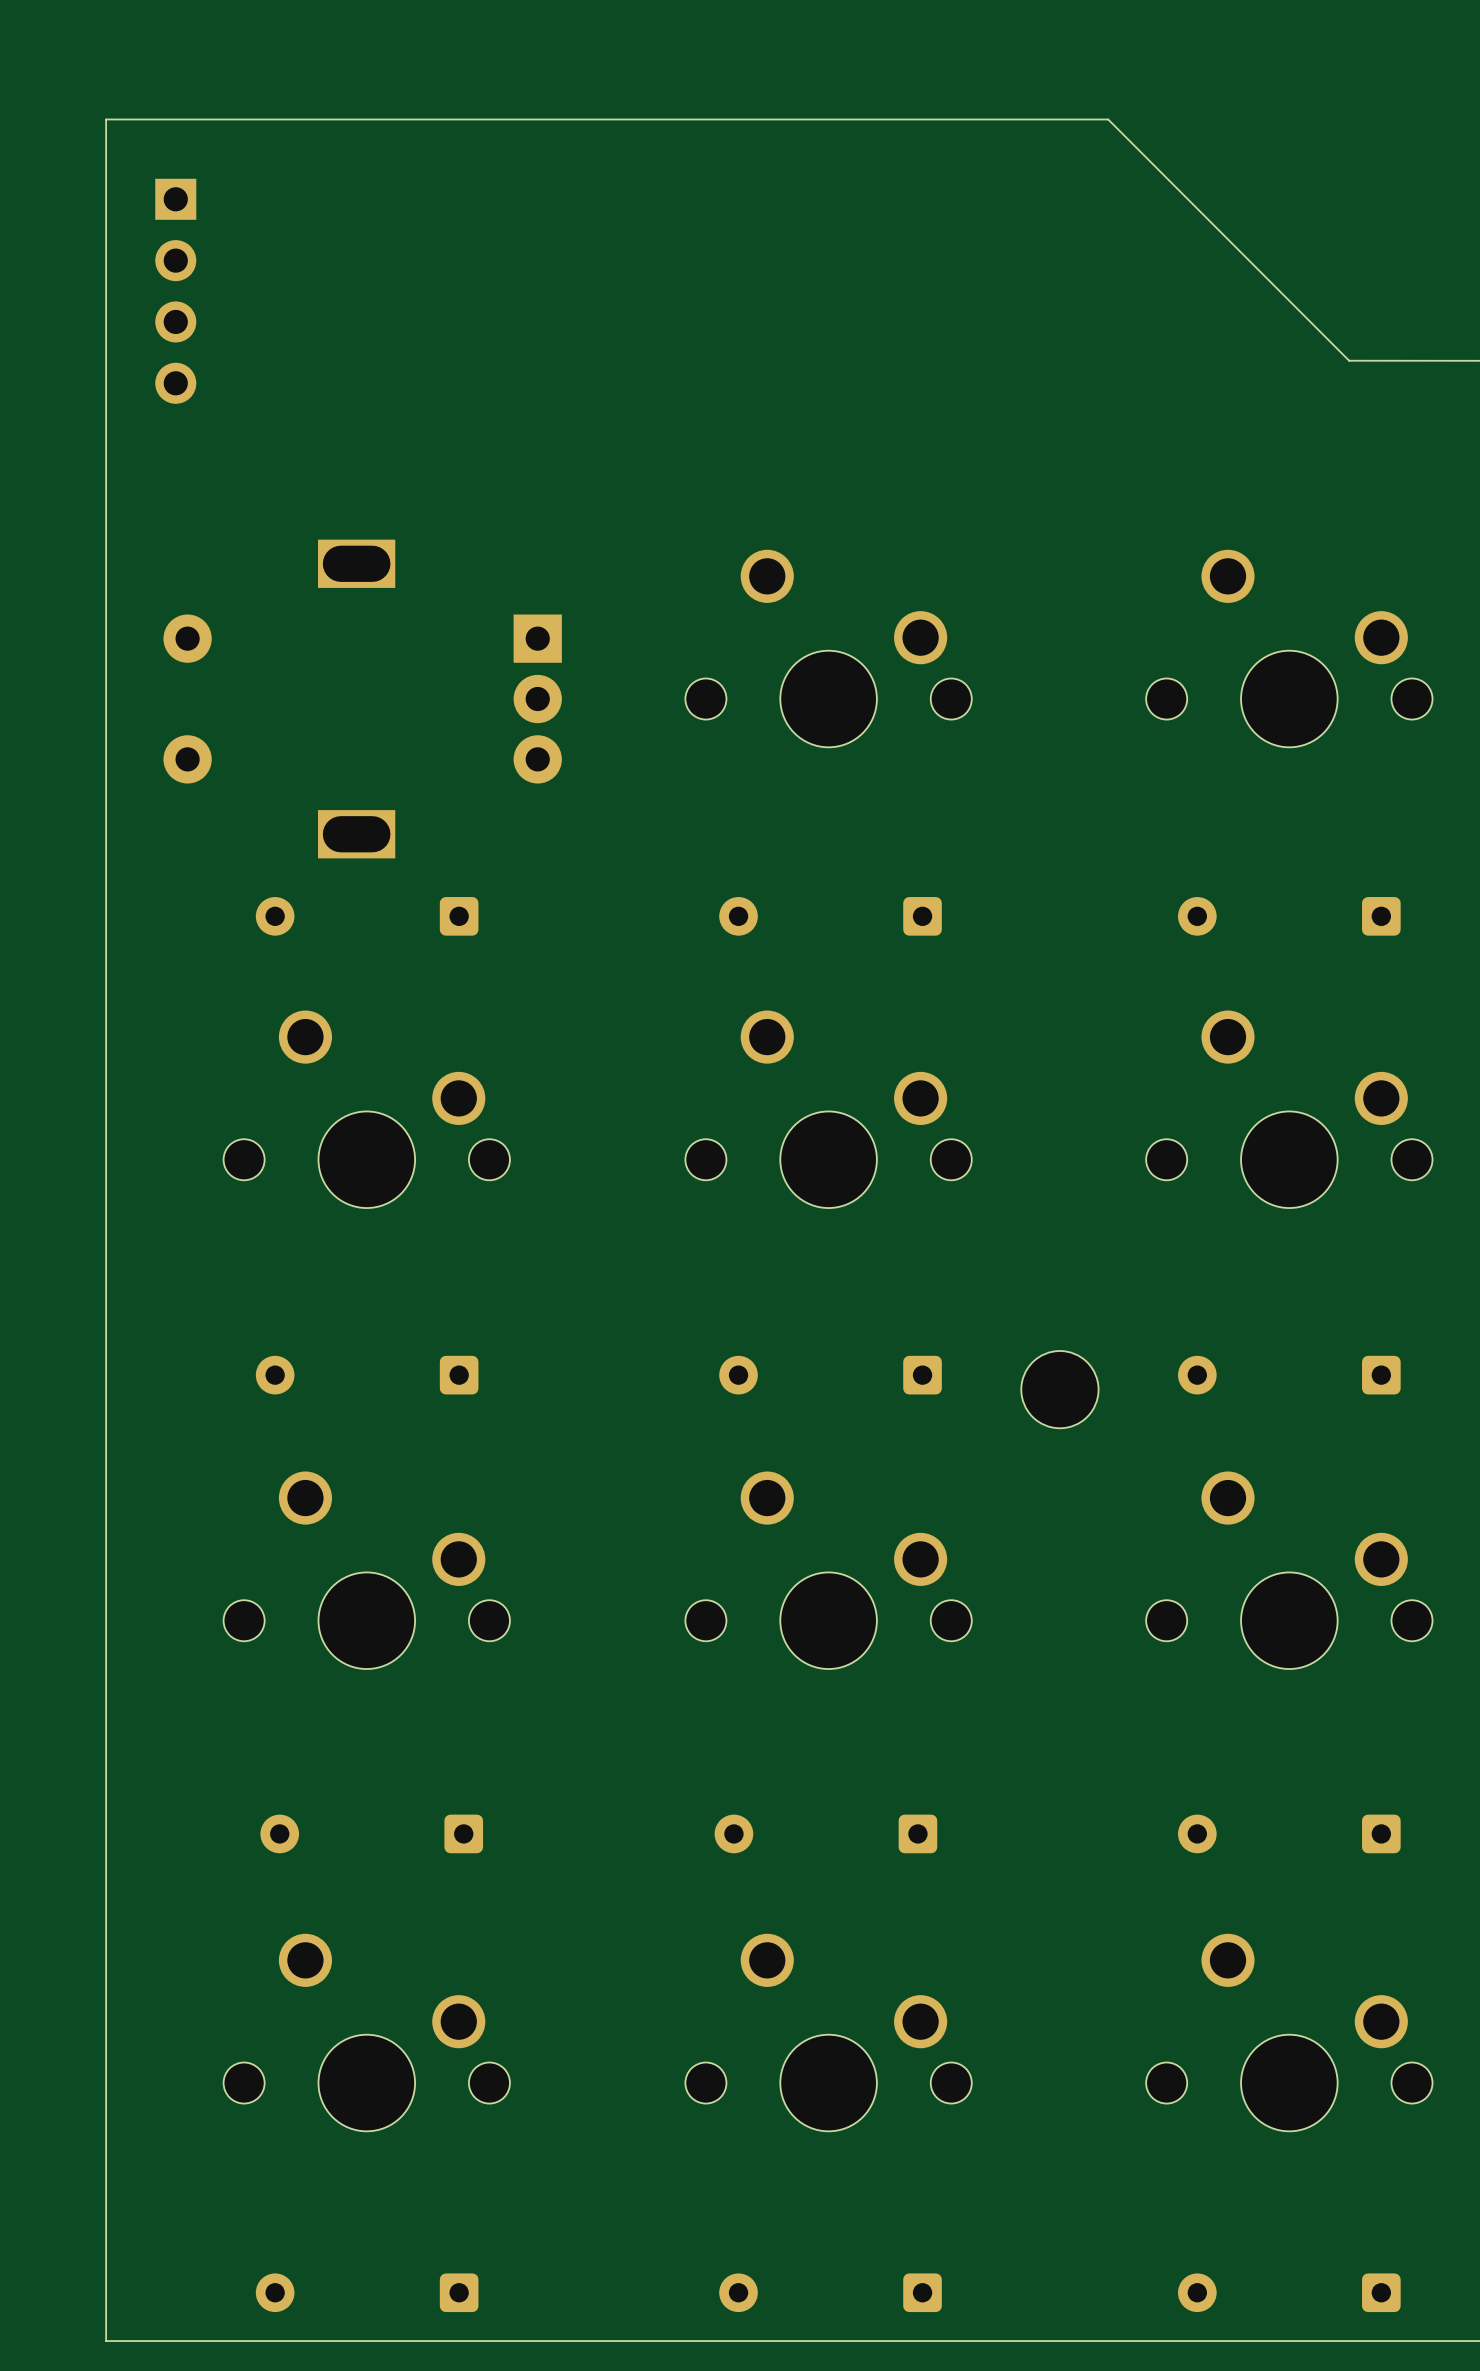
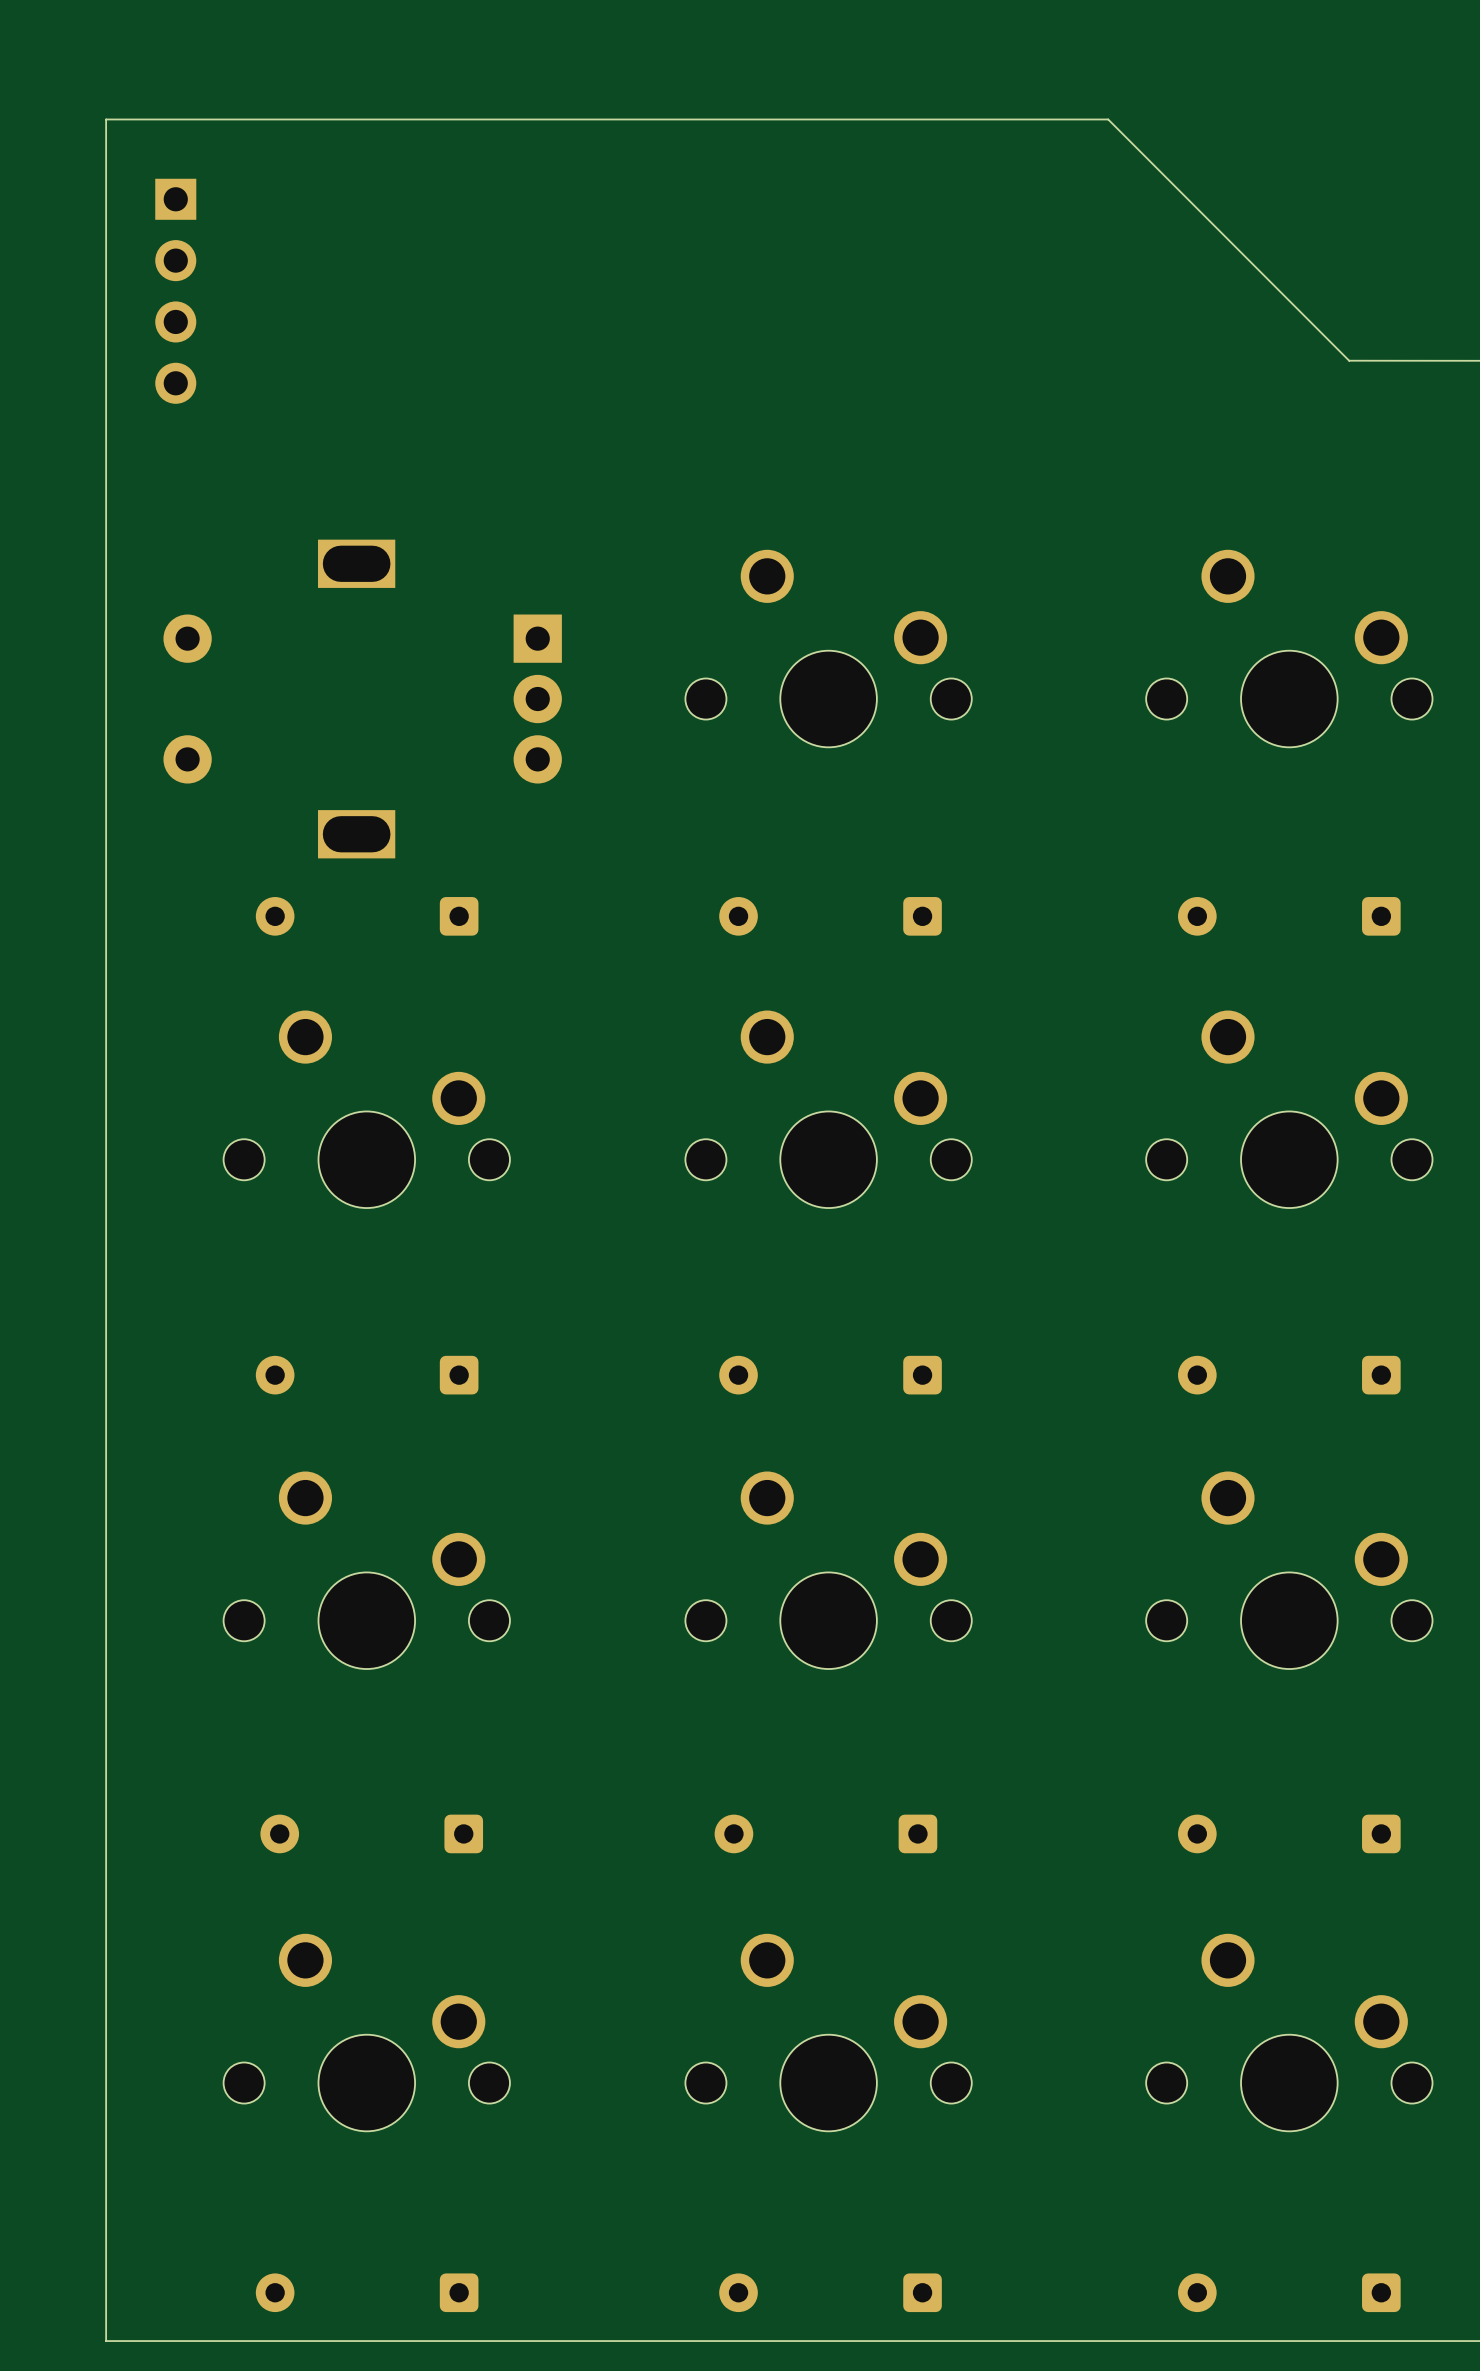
part: (1059, 1389) -> none

